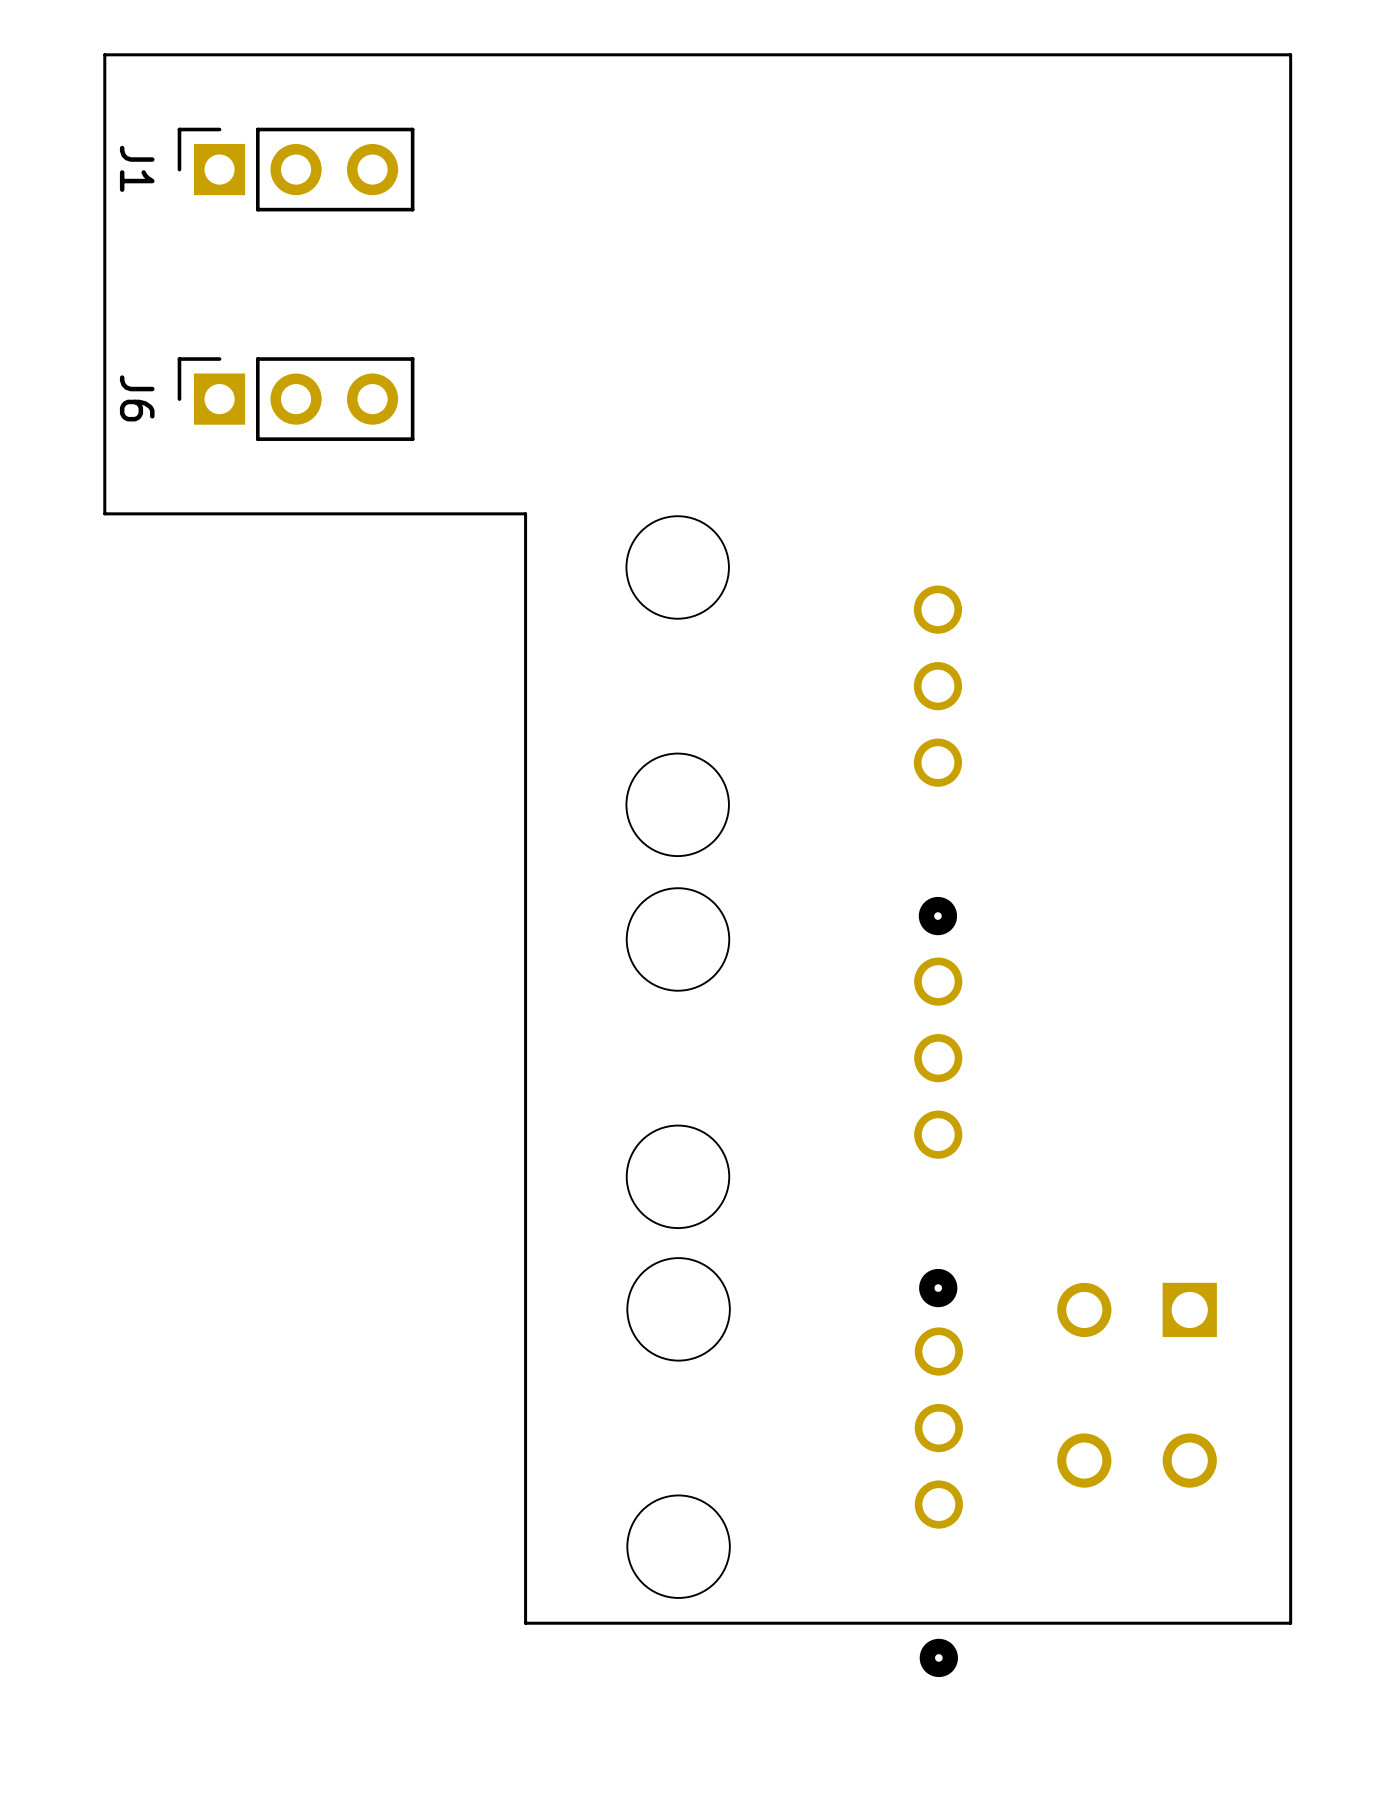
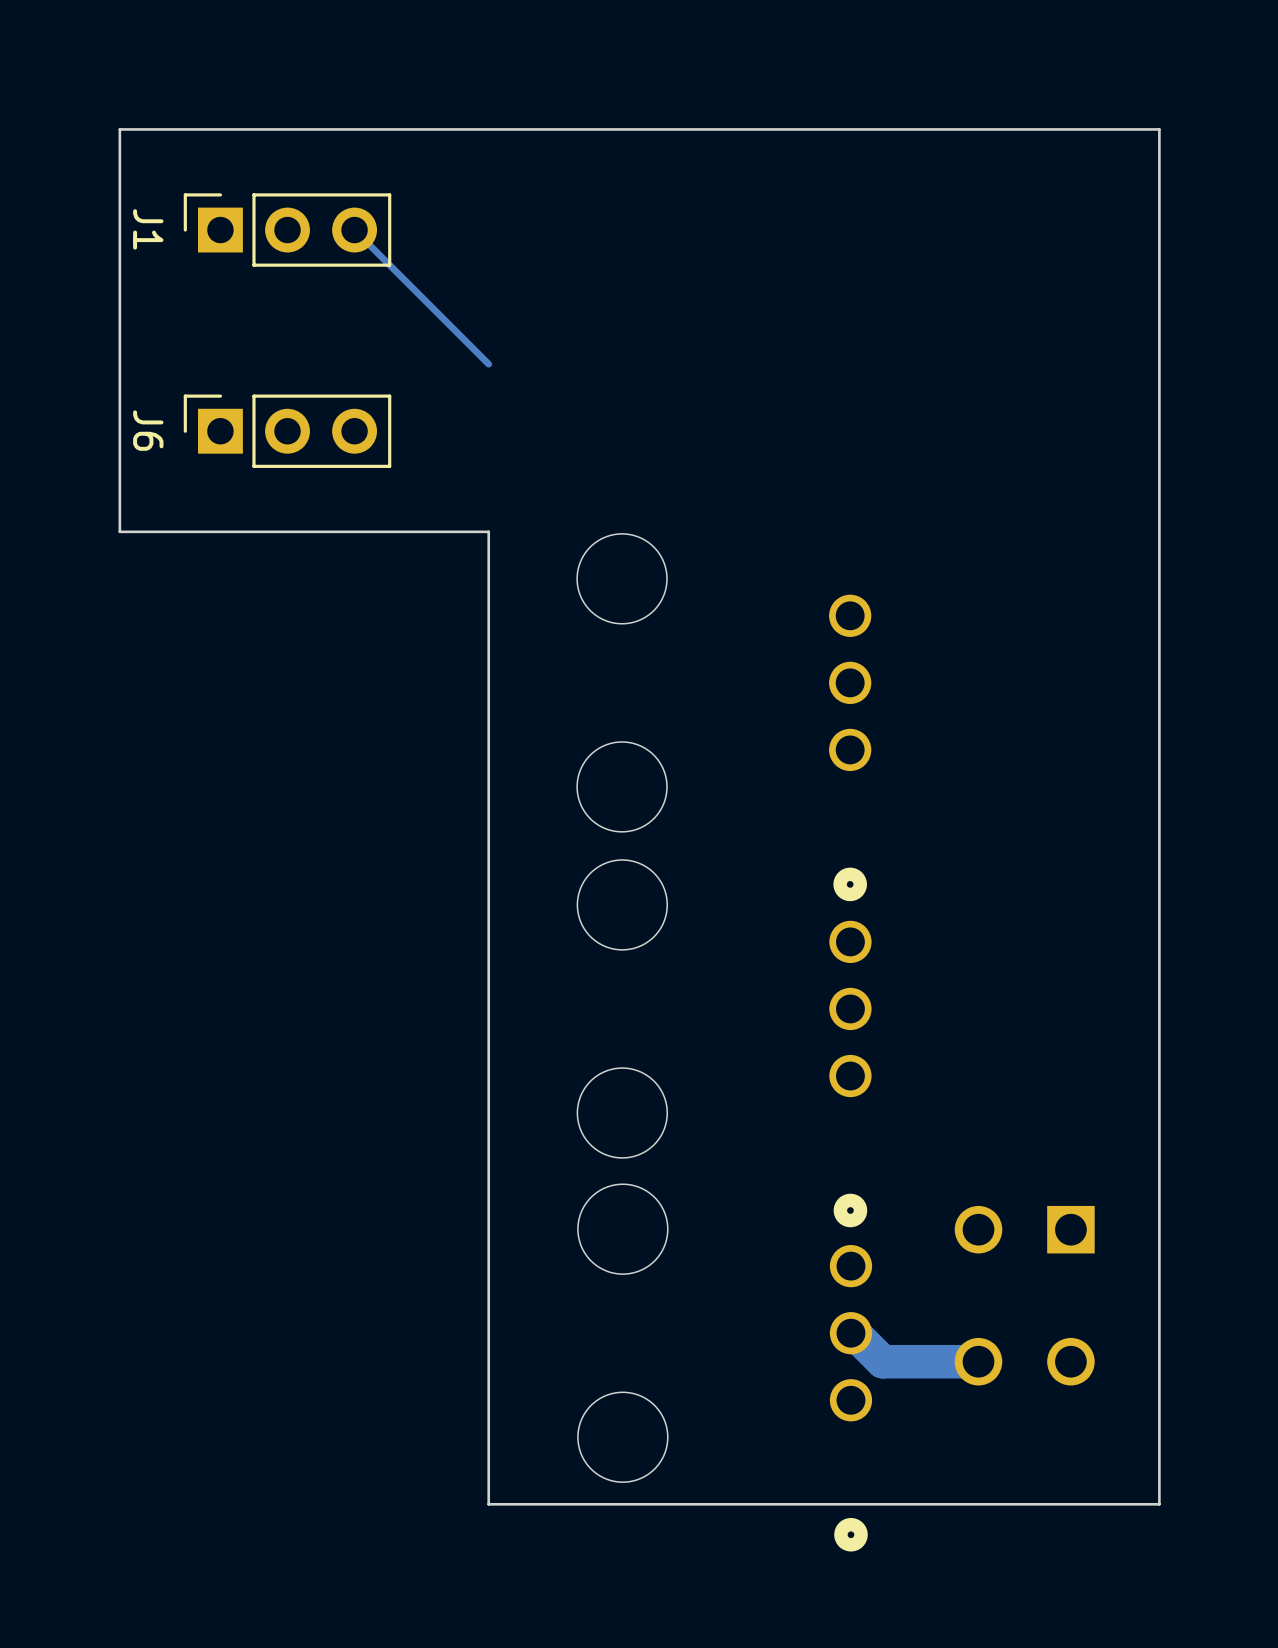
track: none -> (354, 230) (488, 364)
track: none -> (857, 1336) (882, 1361) (978, 1361)

